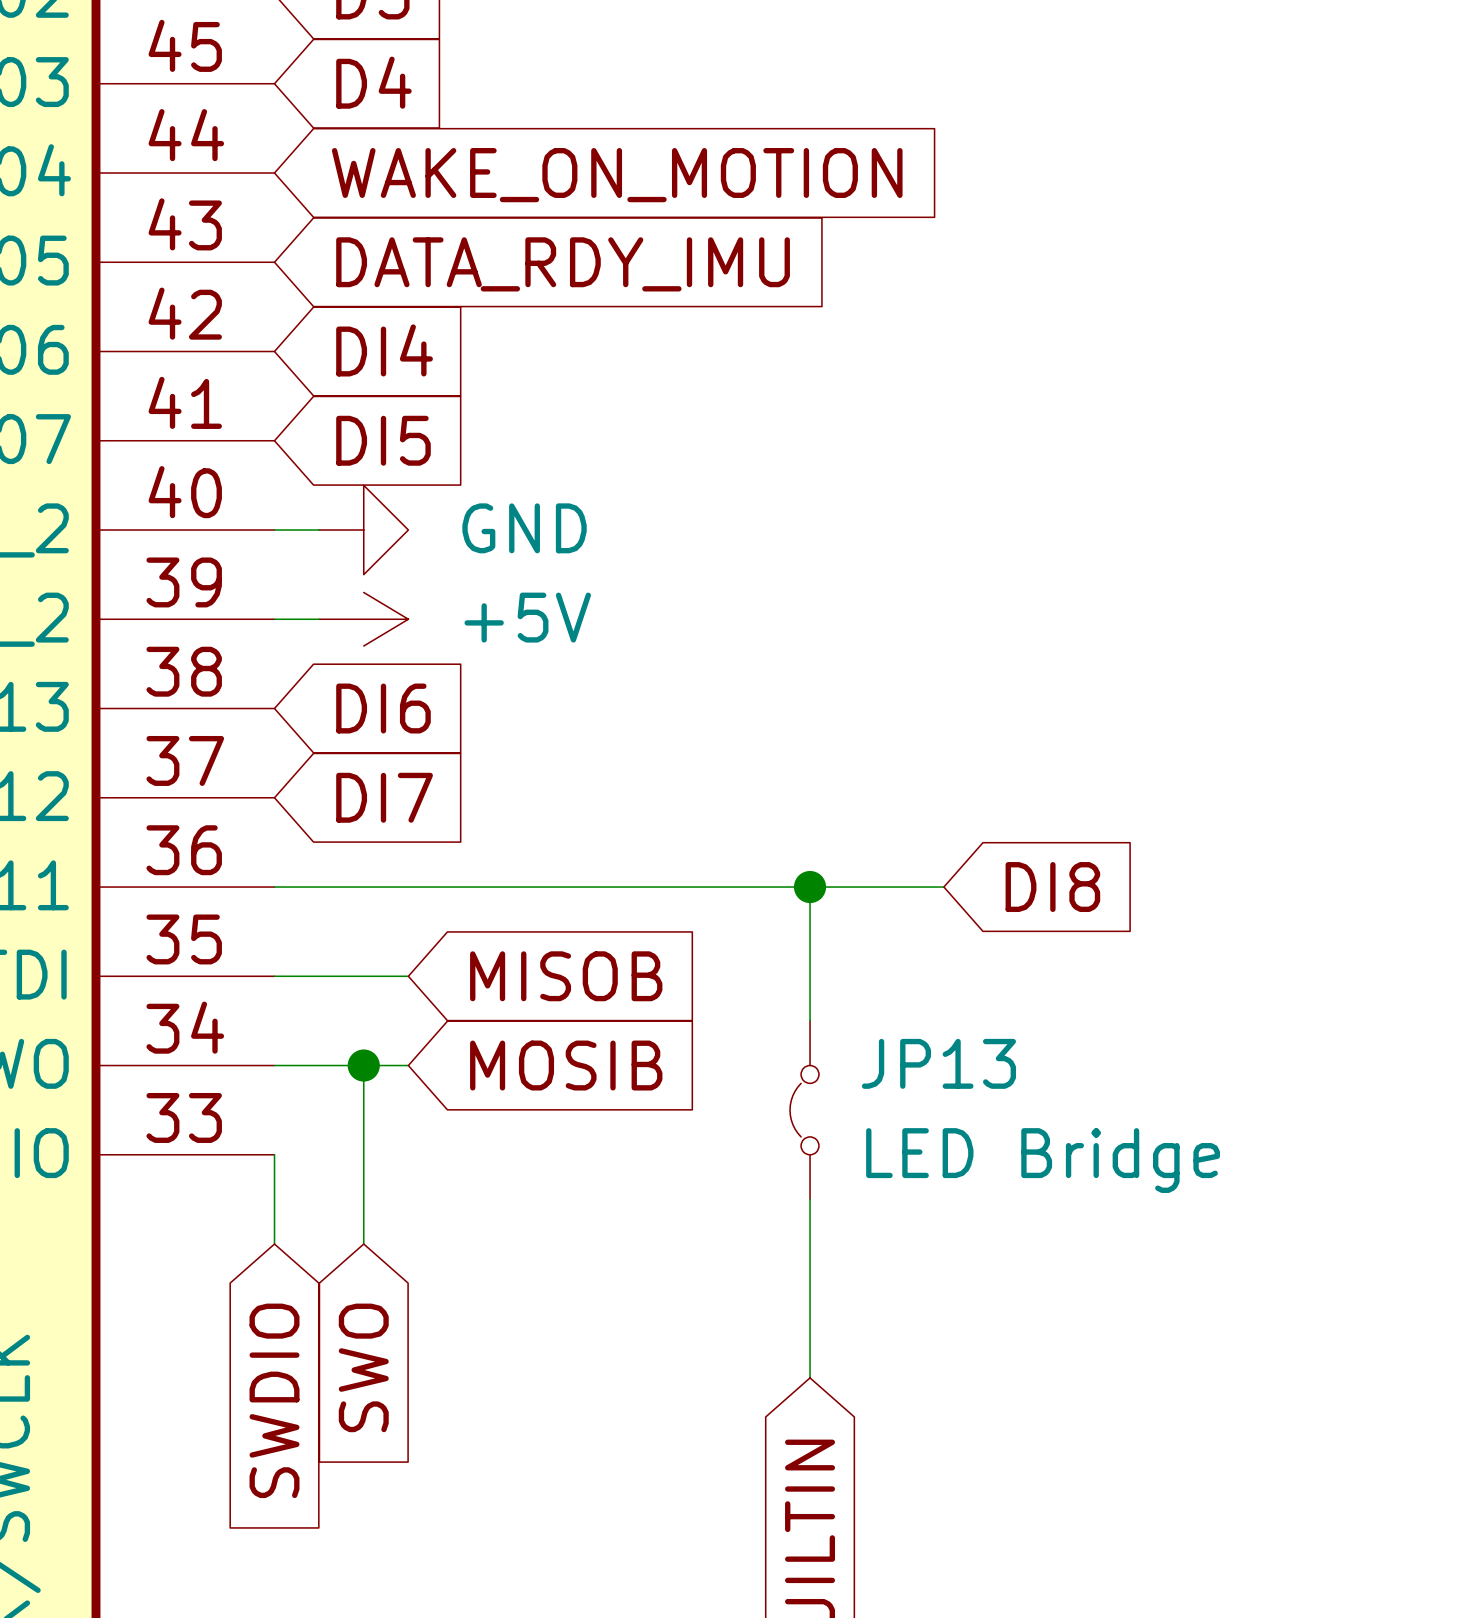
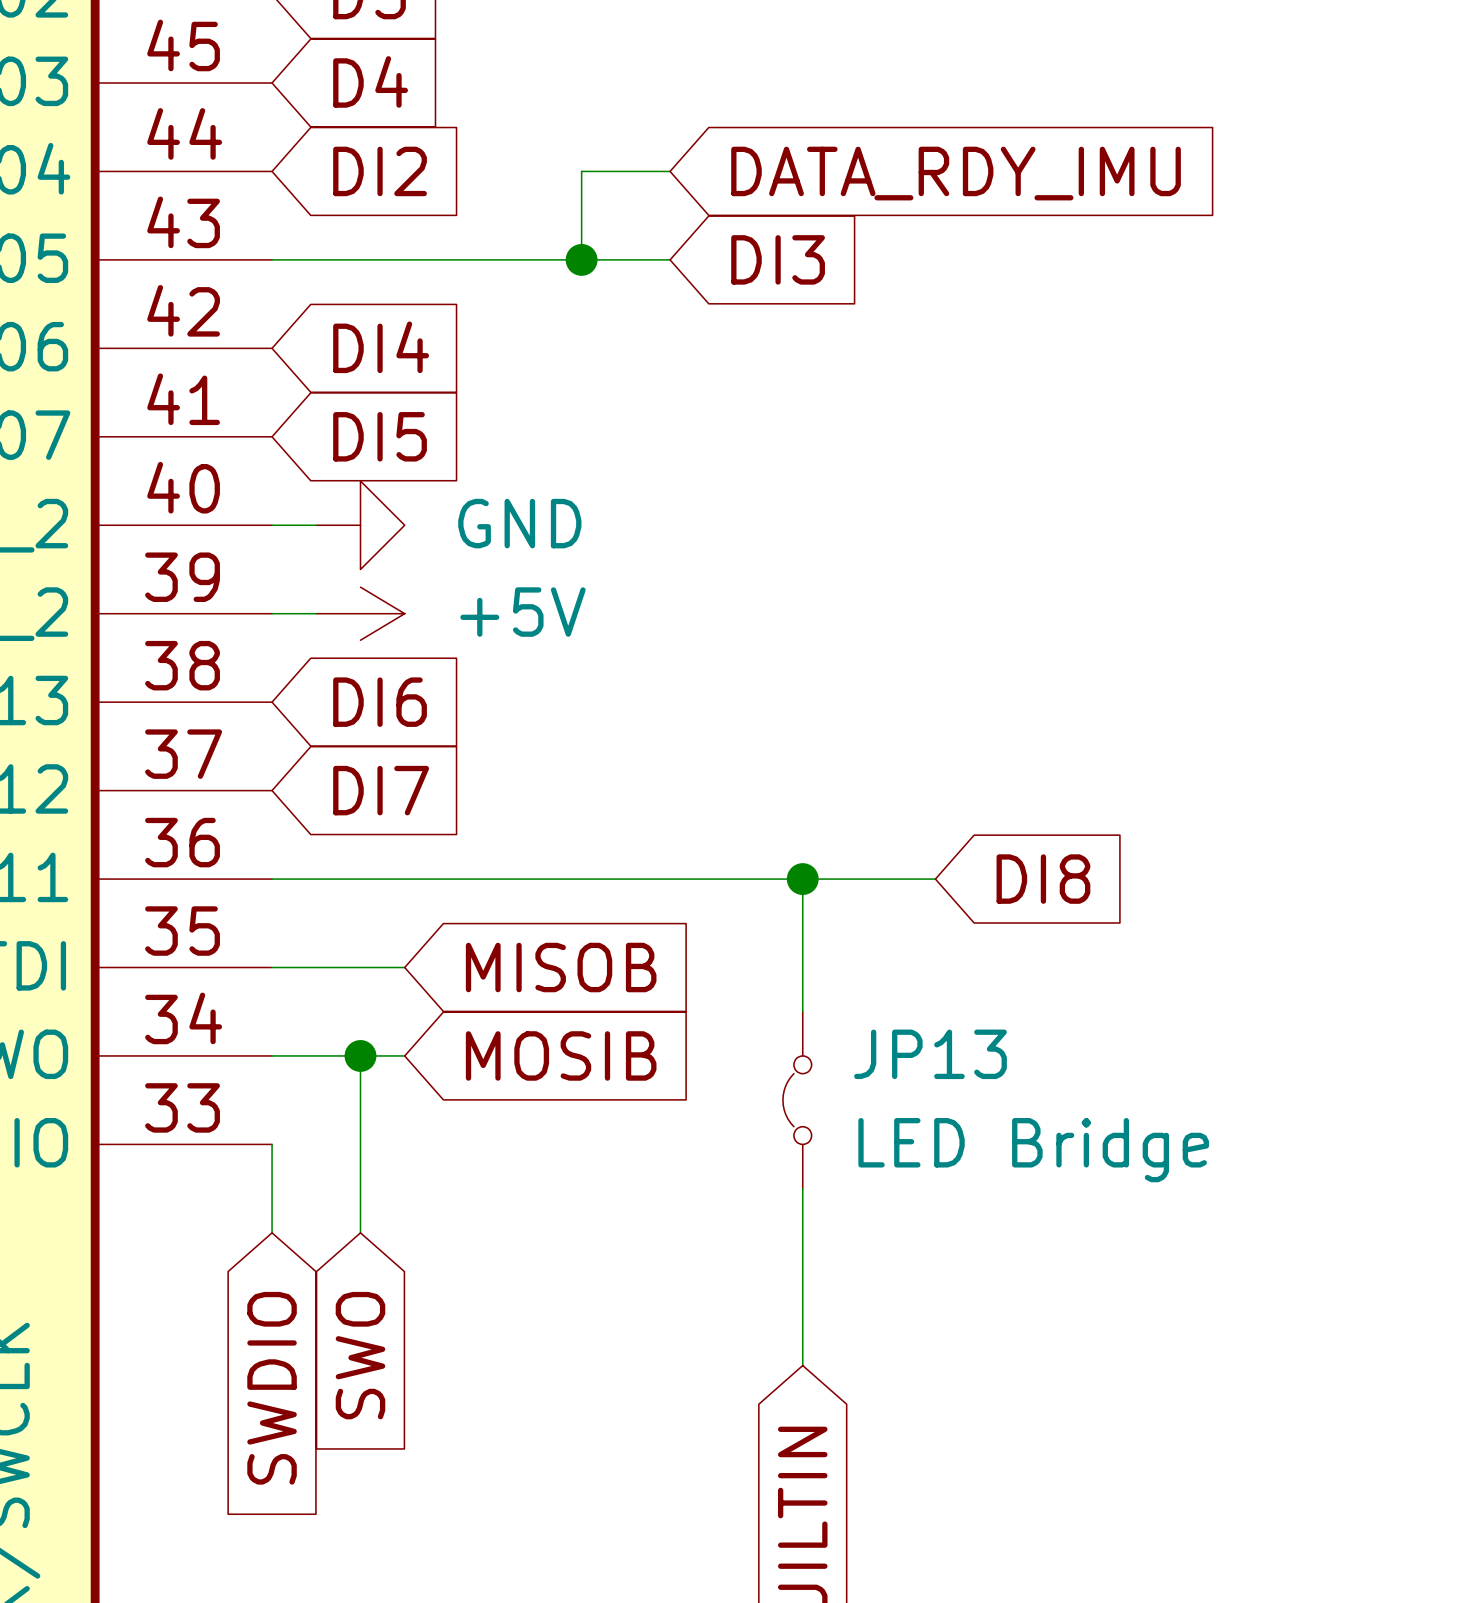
wire: none -> (670, 171) (581, 171) (581, 259)
global label: WAKE_ON_MOTION (617, 175) -> DI2 (380, 171)
wire: none -> (272, 259) (670, 259)
junction: none -> (581, 259)
global label: none -> DI3 (778, 259)
global label position: DATA_RDY_IMU (563, 264) -> DATA_RDY_IMU (956, 173)

